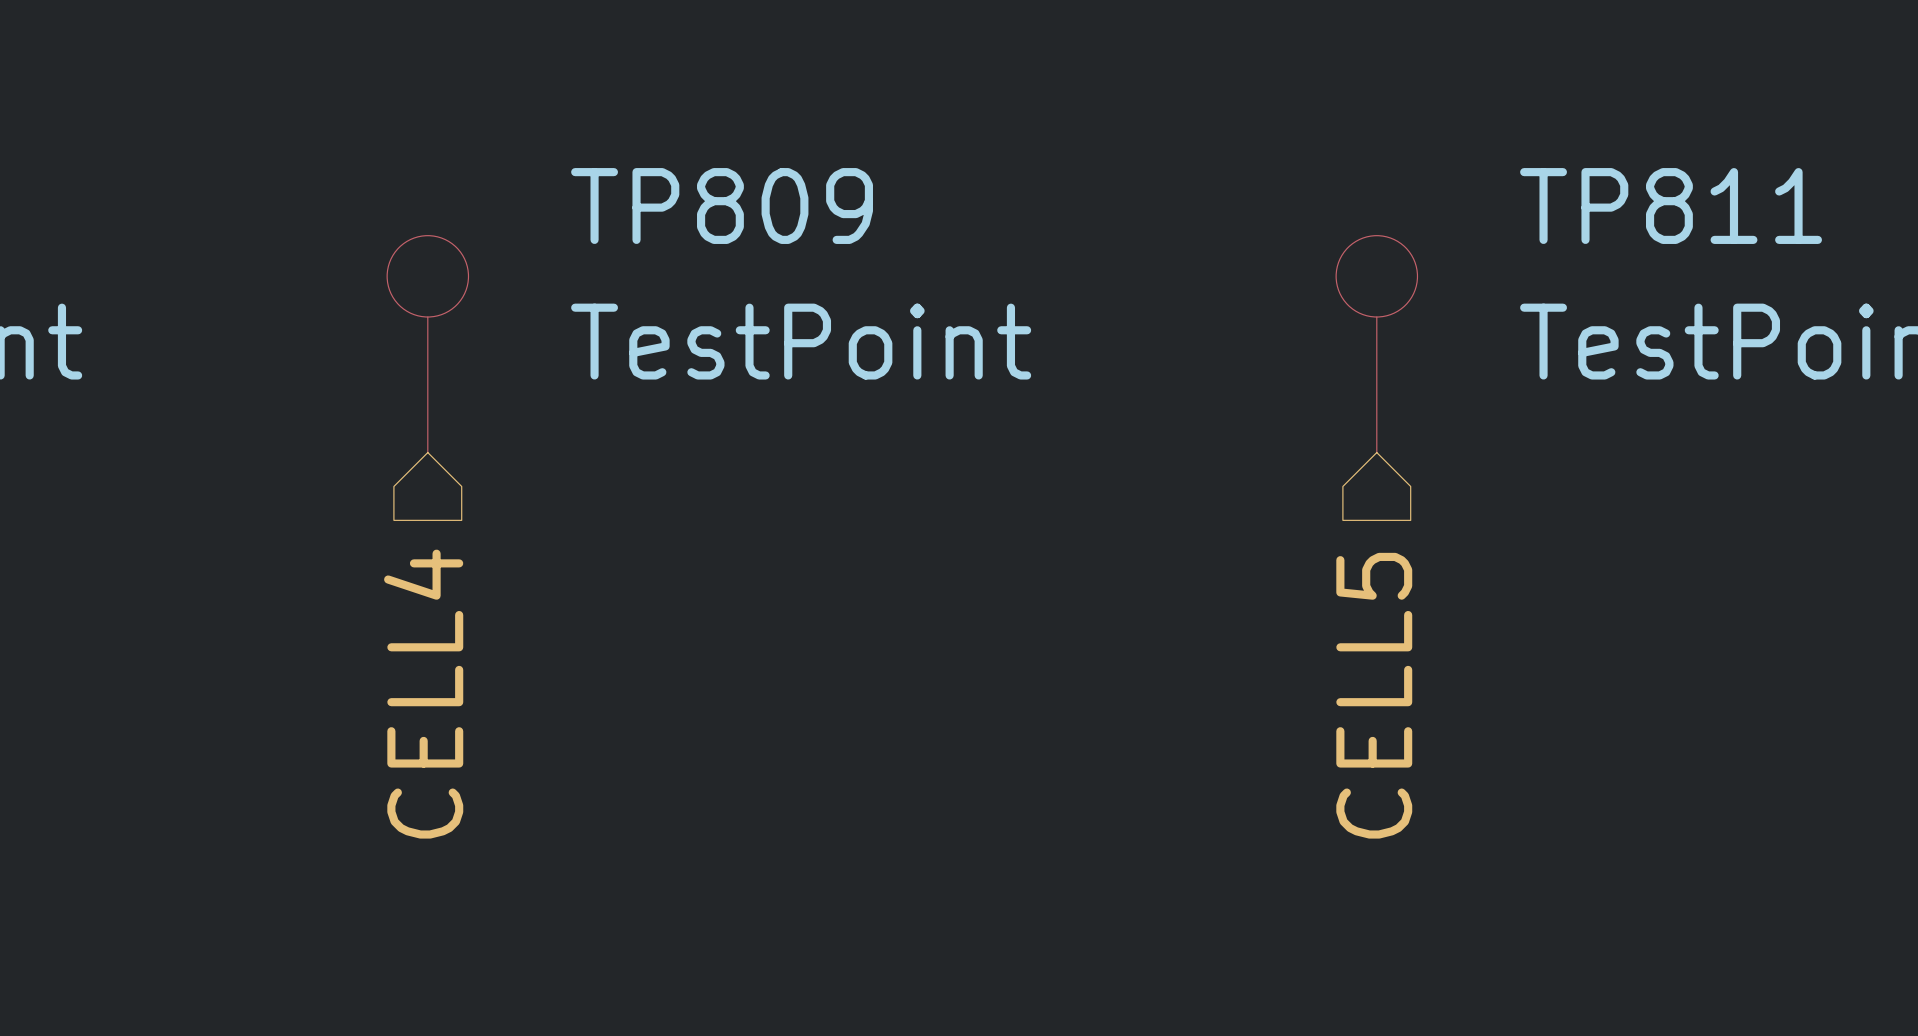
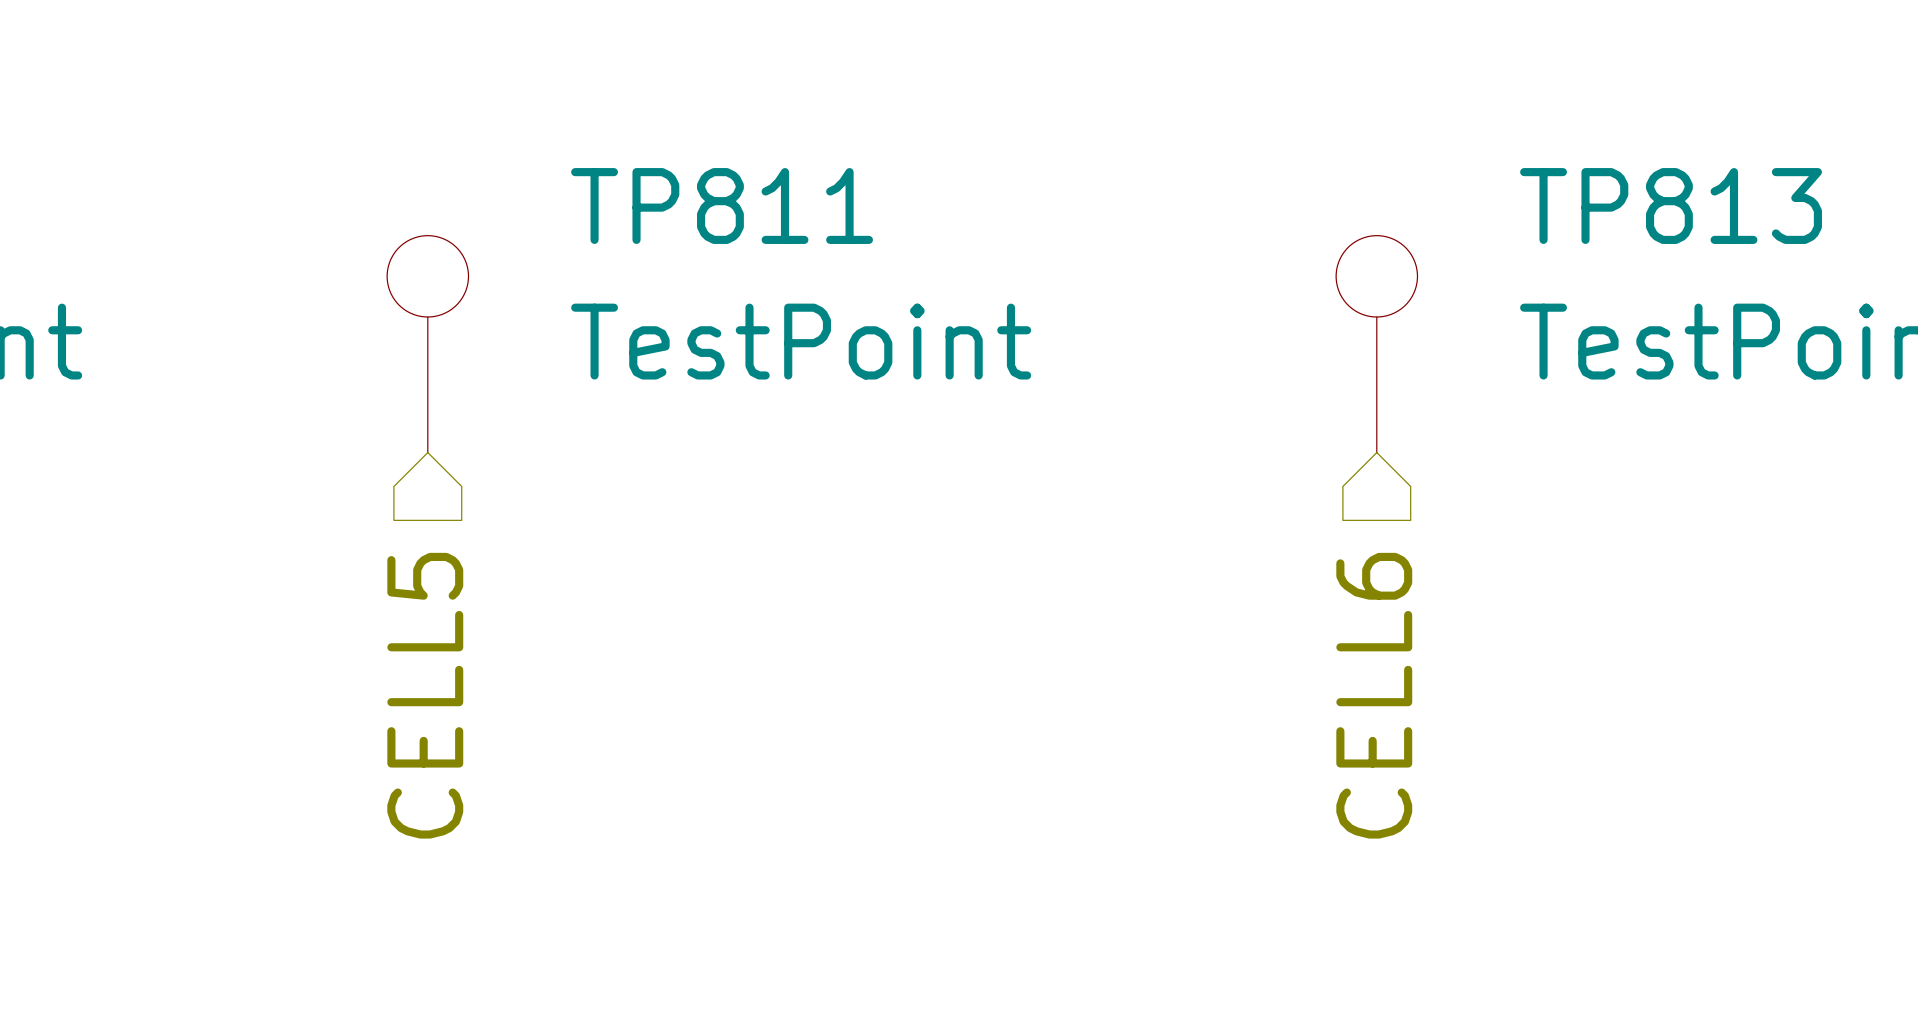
TP809 name: TP809 (722, 206) -> TP811 (722, 206)
TP811 name: TP811 (1671, 206) -> TP813 (1671, 206)
hierarchical label: CELL4 (423, 694) -> CELL5 (425, 695)
hierarchical label: CELL5 (1374, 695) -> CELL6 (1374, 695)

